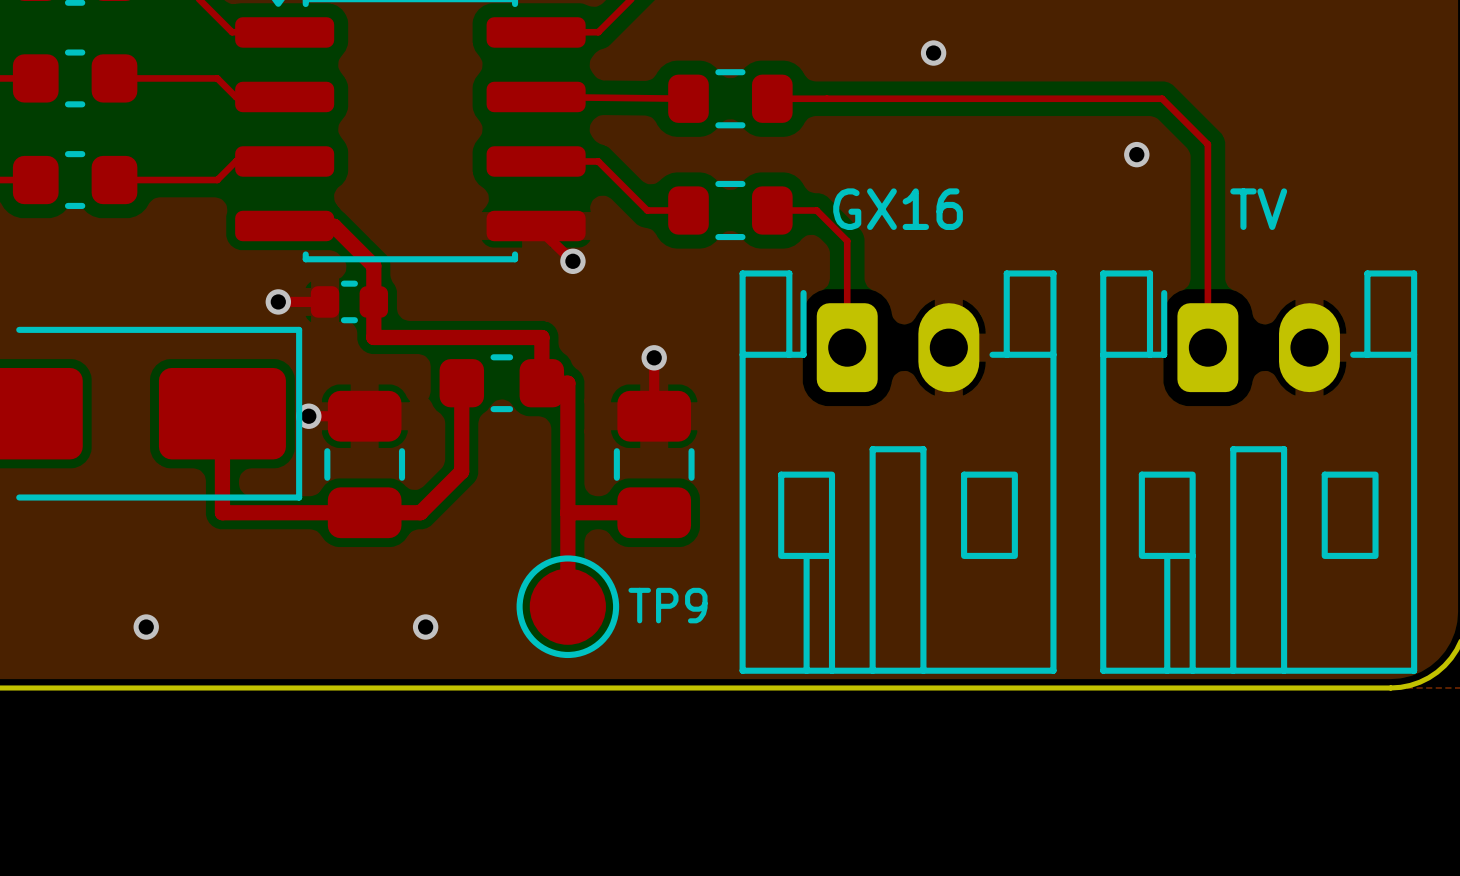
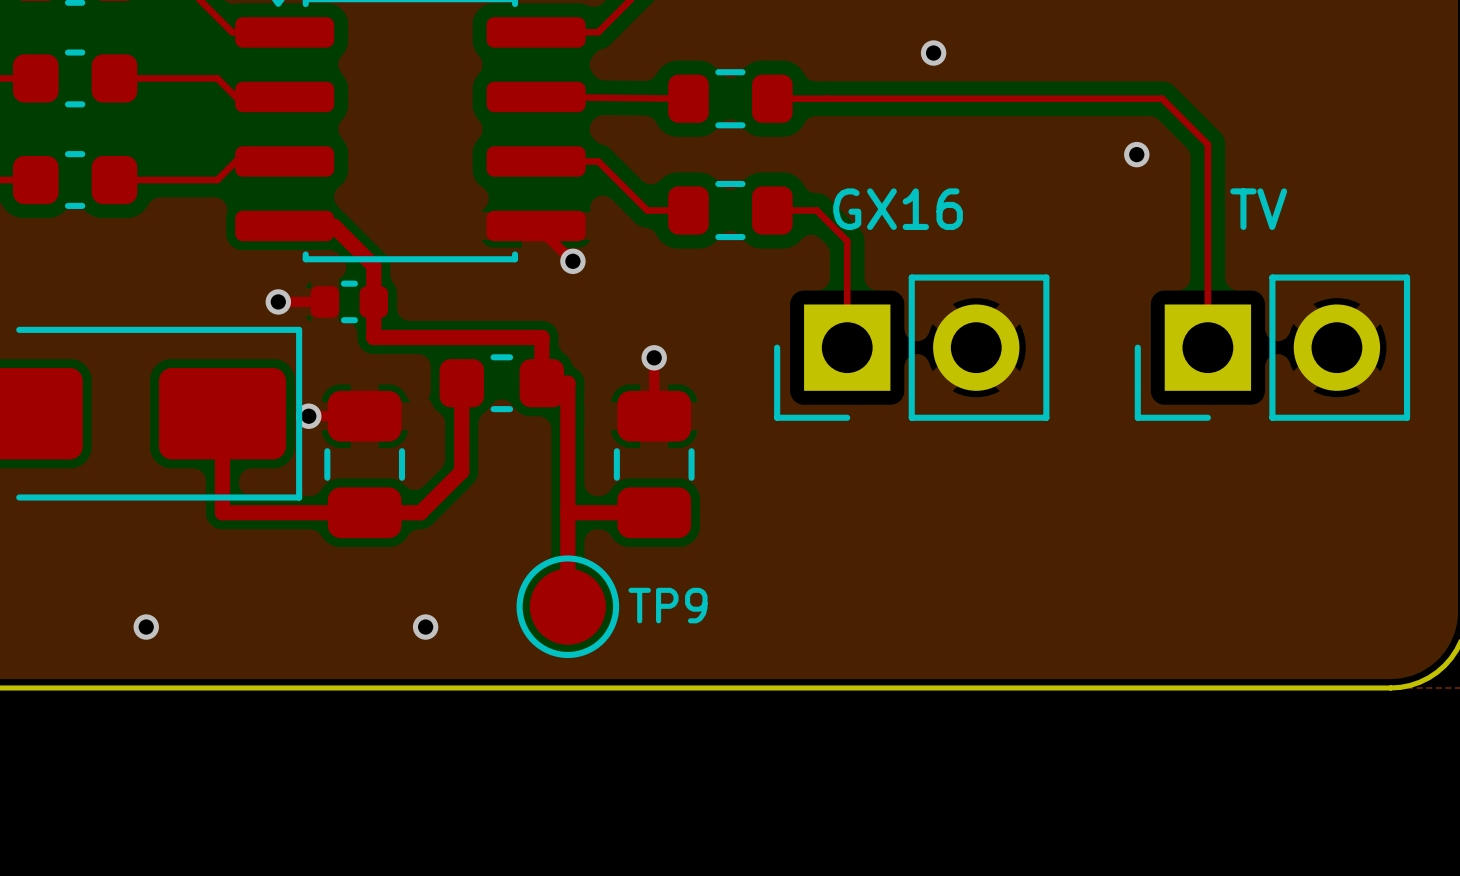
part: none -> (911, 347)
part: none -> (1272, 347)
part: (898, 472) -> none
part: (1258, 472) -> none

